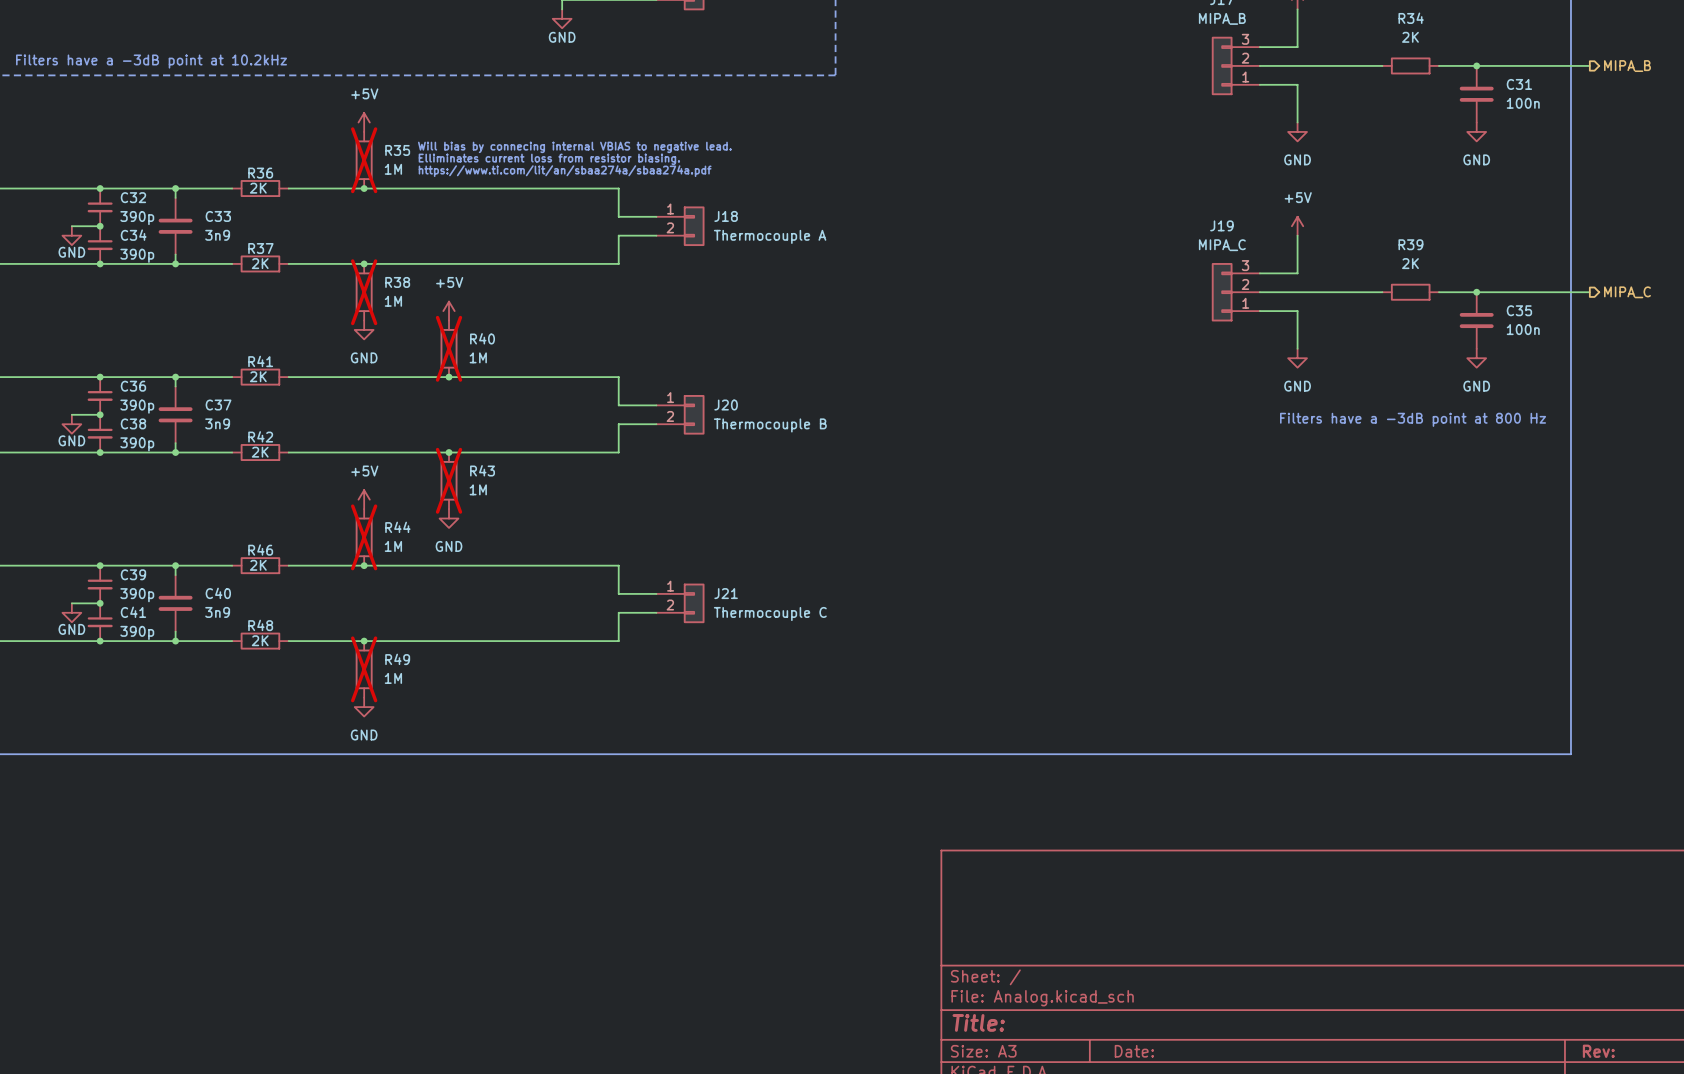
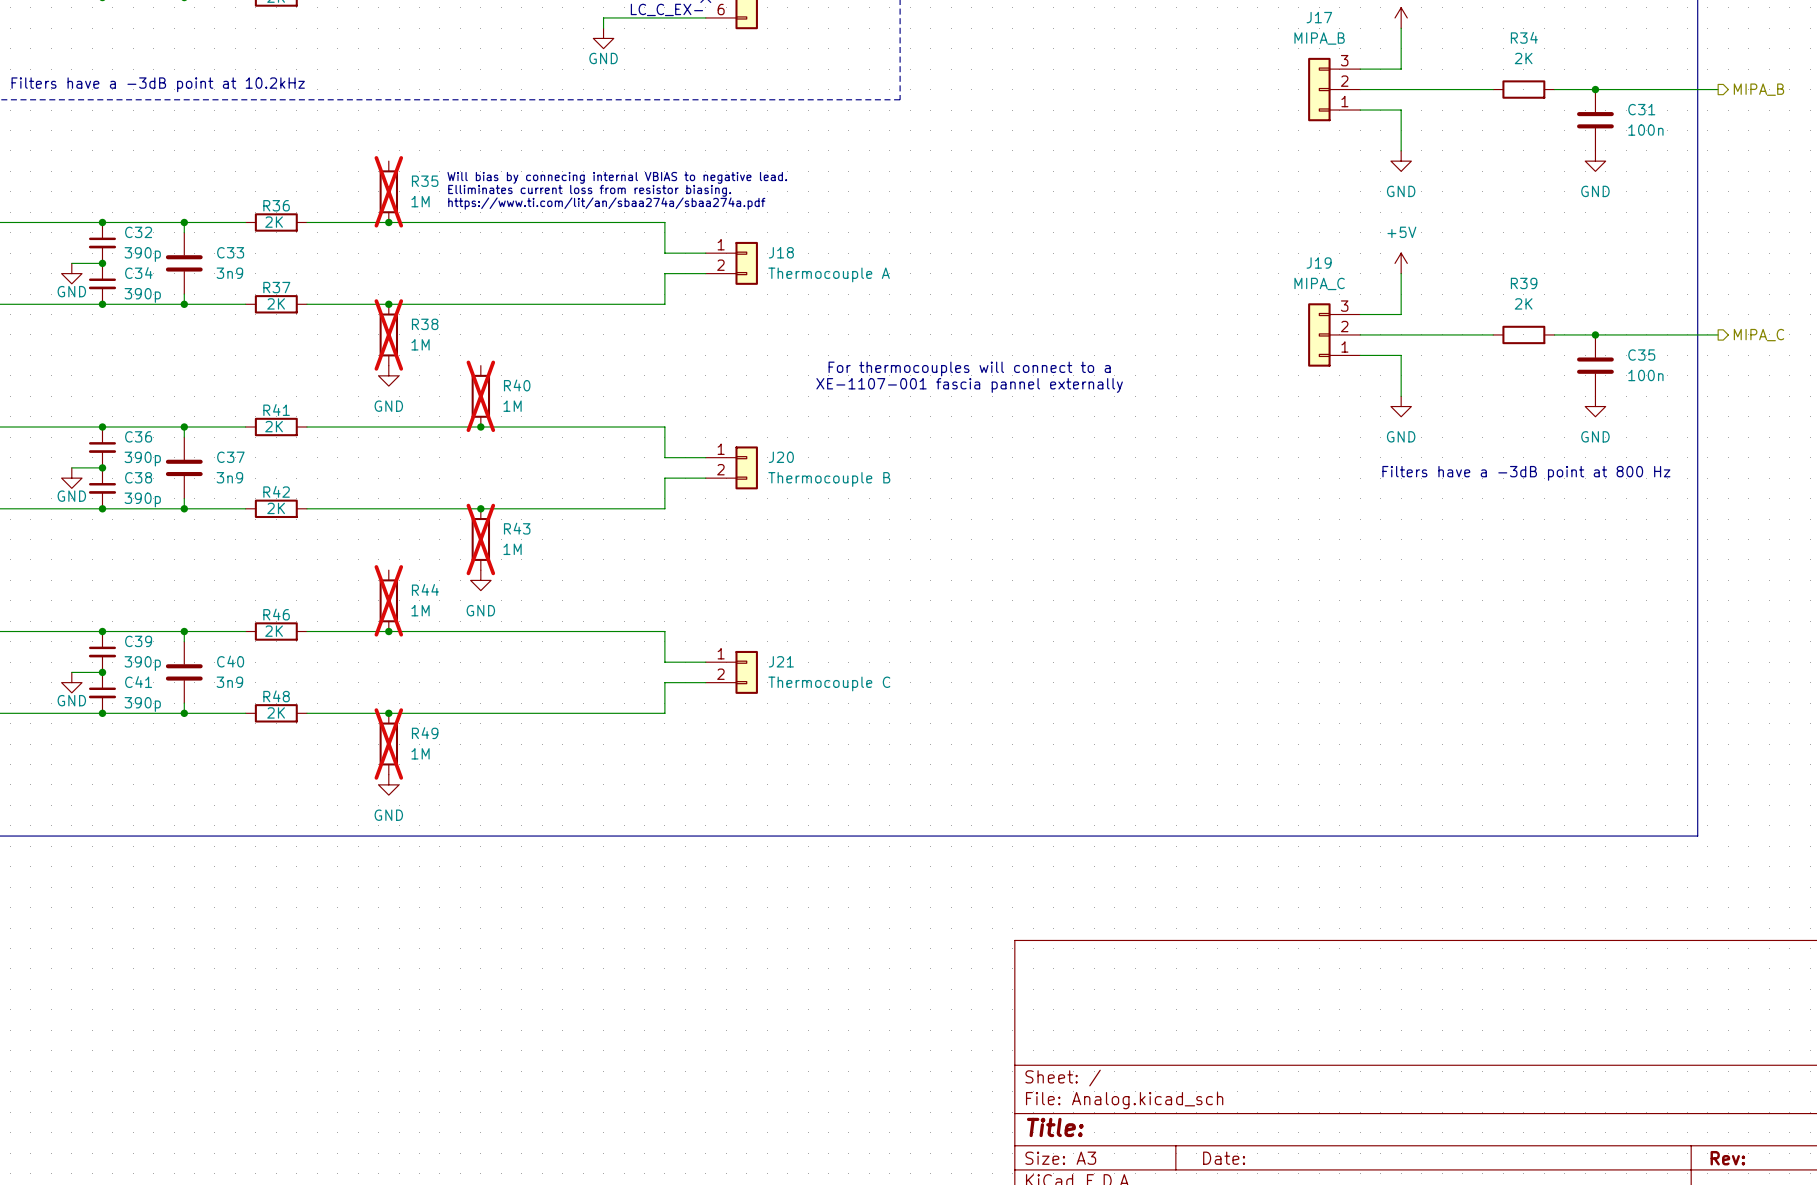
power symbol: +5V (364, 122) -> none
power symbol: +5V (449, 311) -> none
text: none -> For thermocouples will connect to a (969, 368)
text: none -> XE-1107-001 fascia pannel externally (969, 385)
power symbol: +5V (364, 499) -> none

